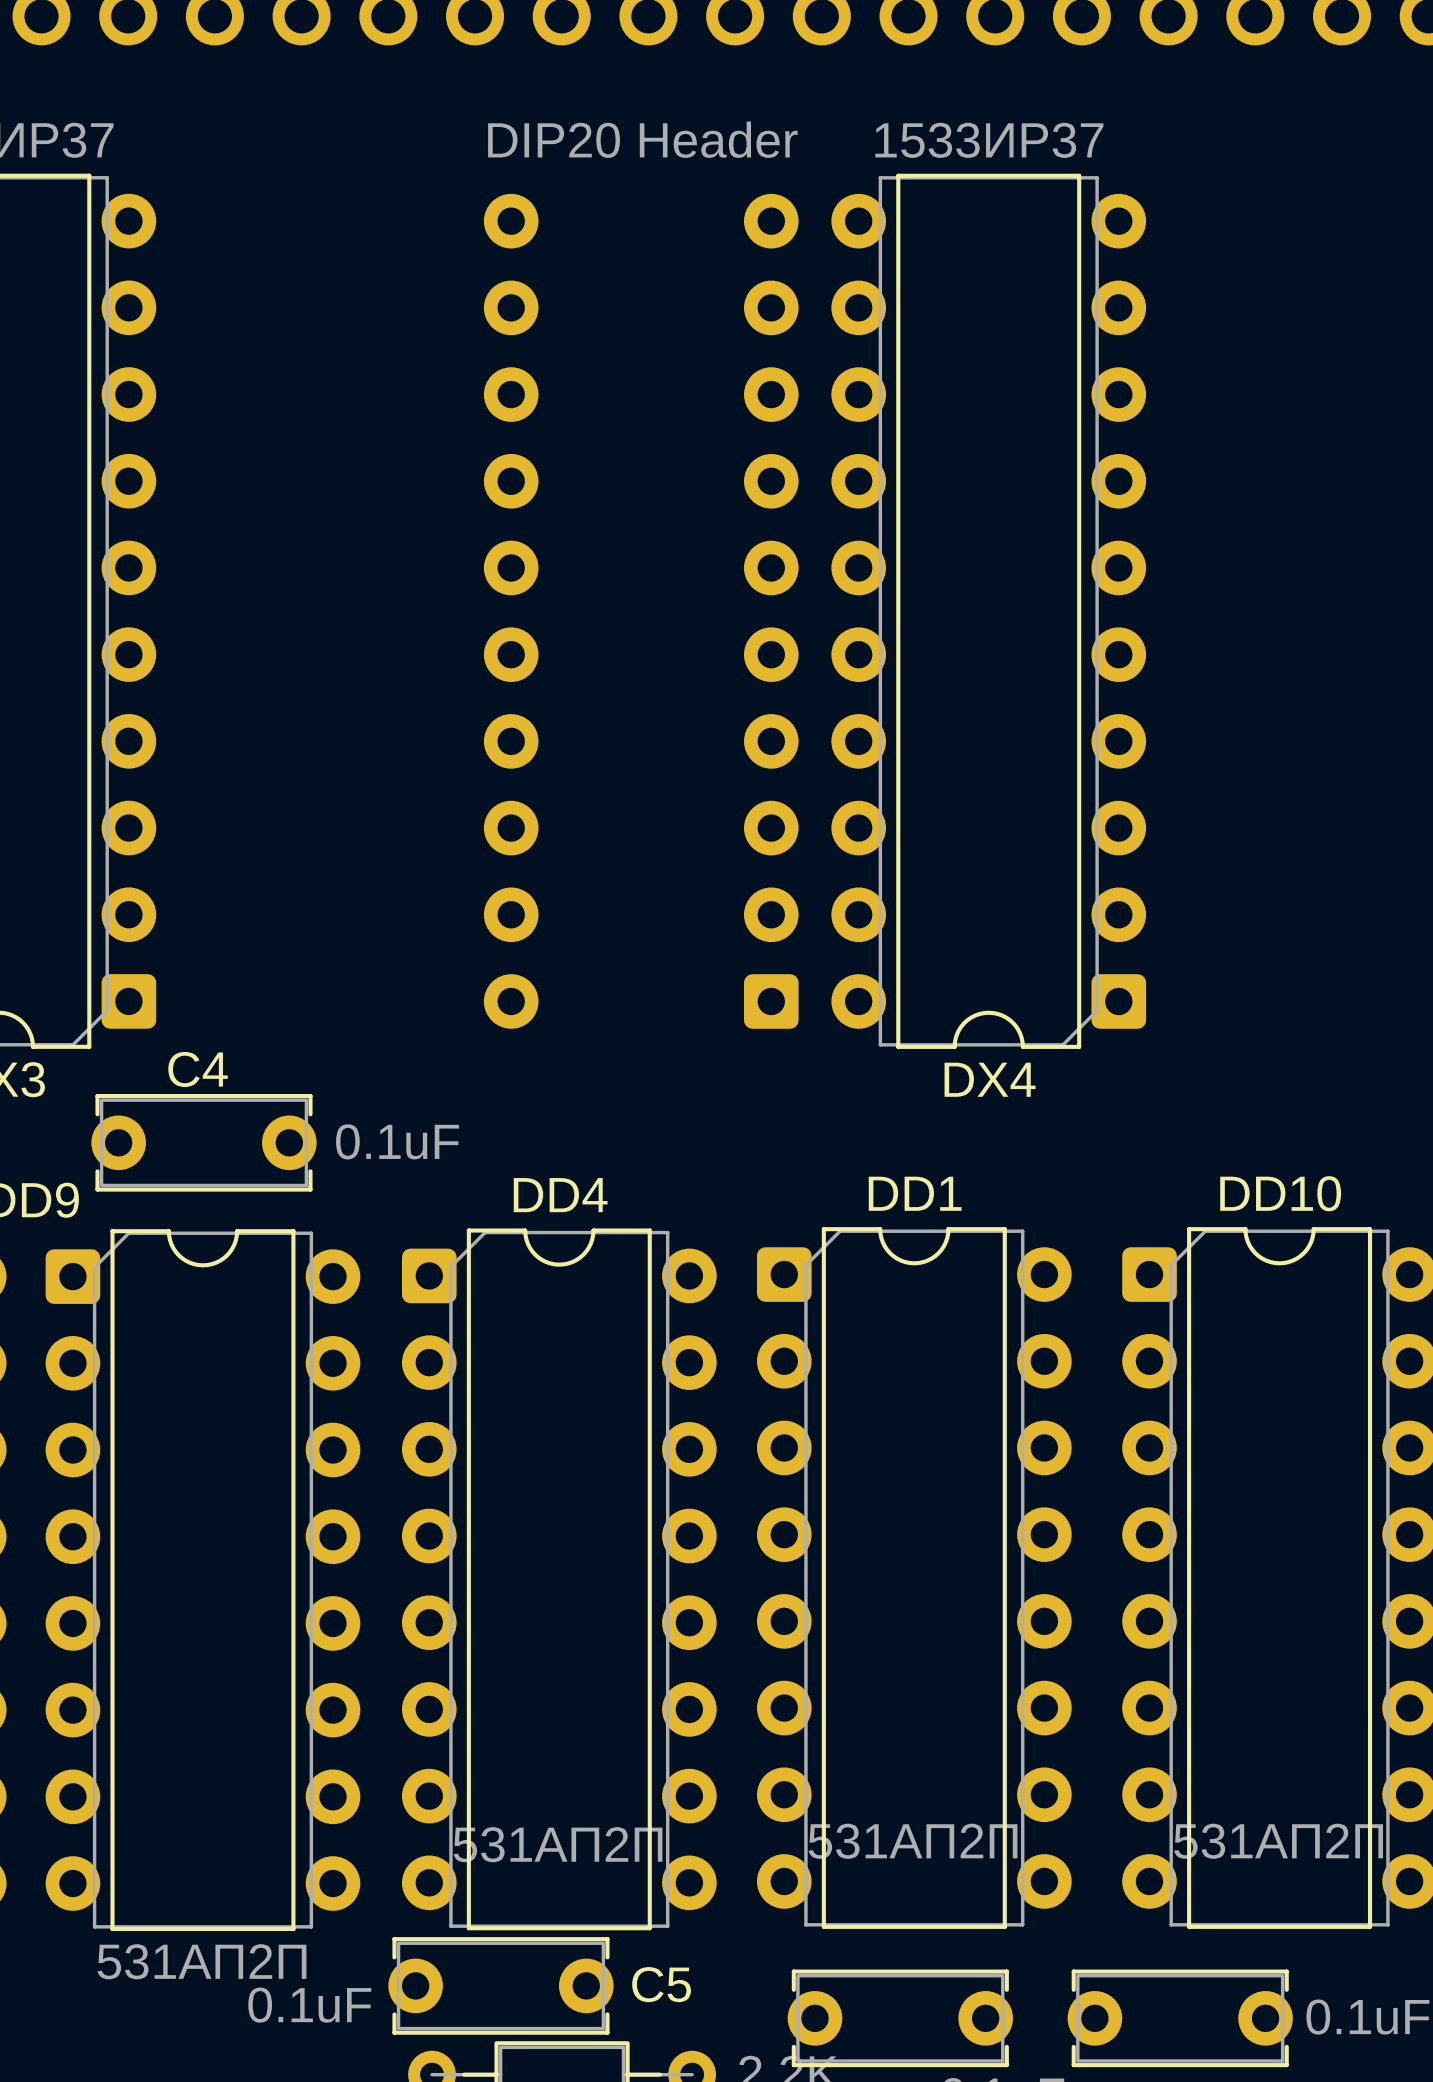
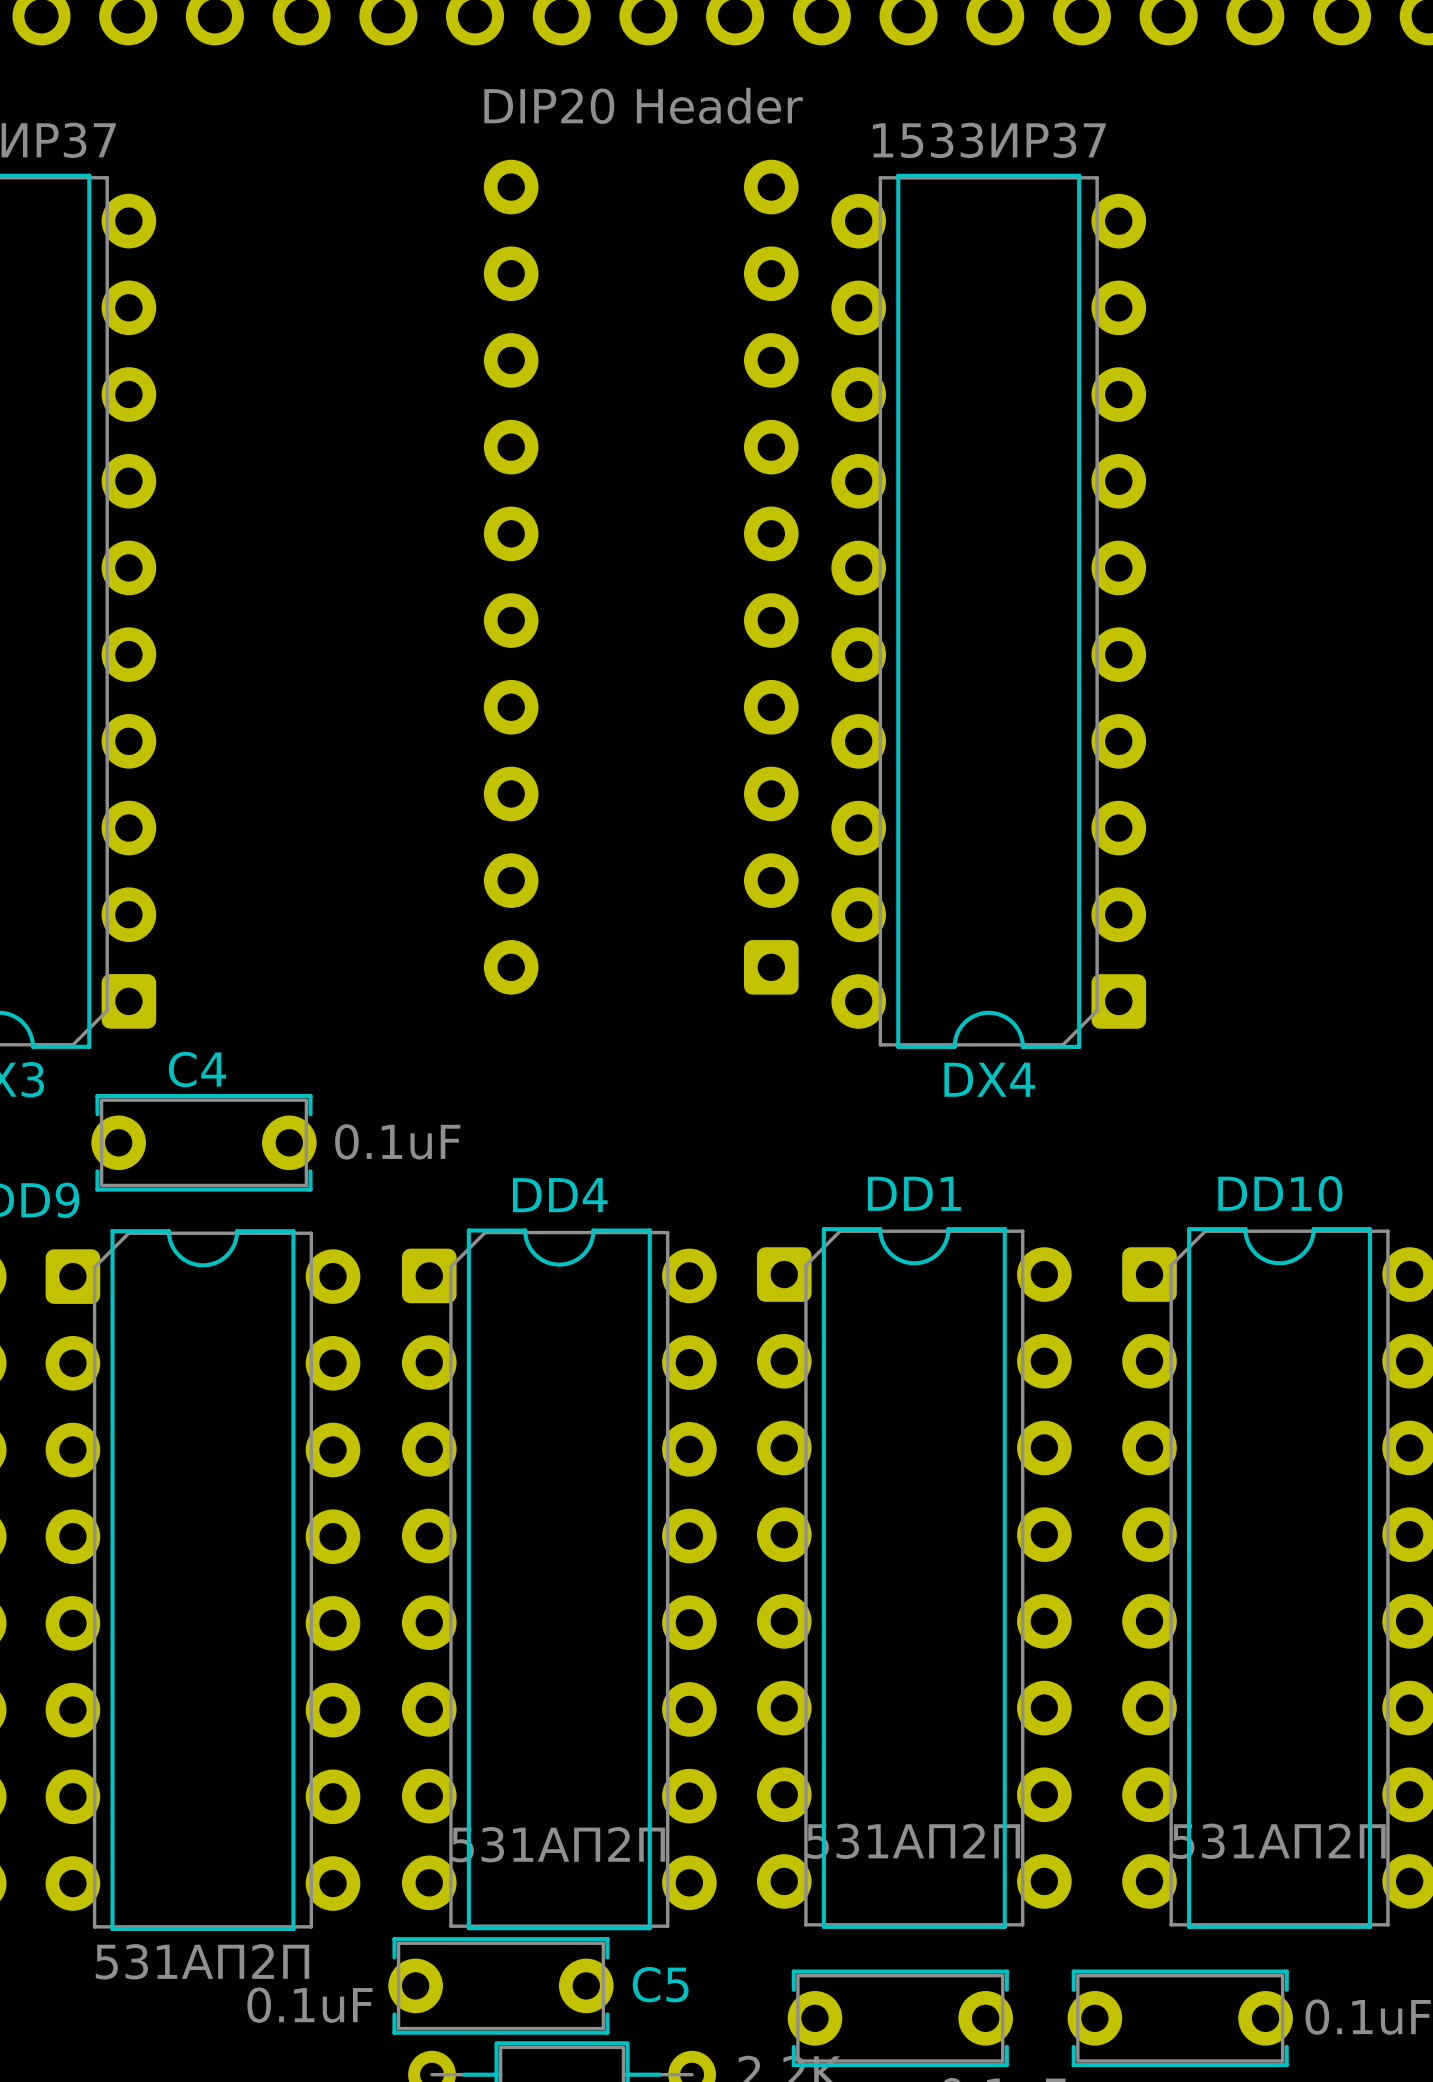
part position: (641, 611) -> (641, 577)

